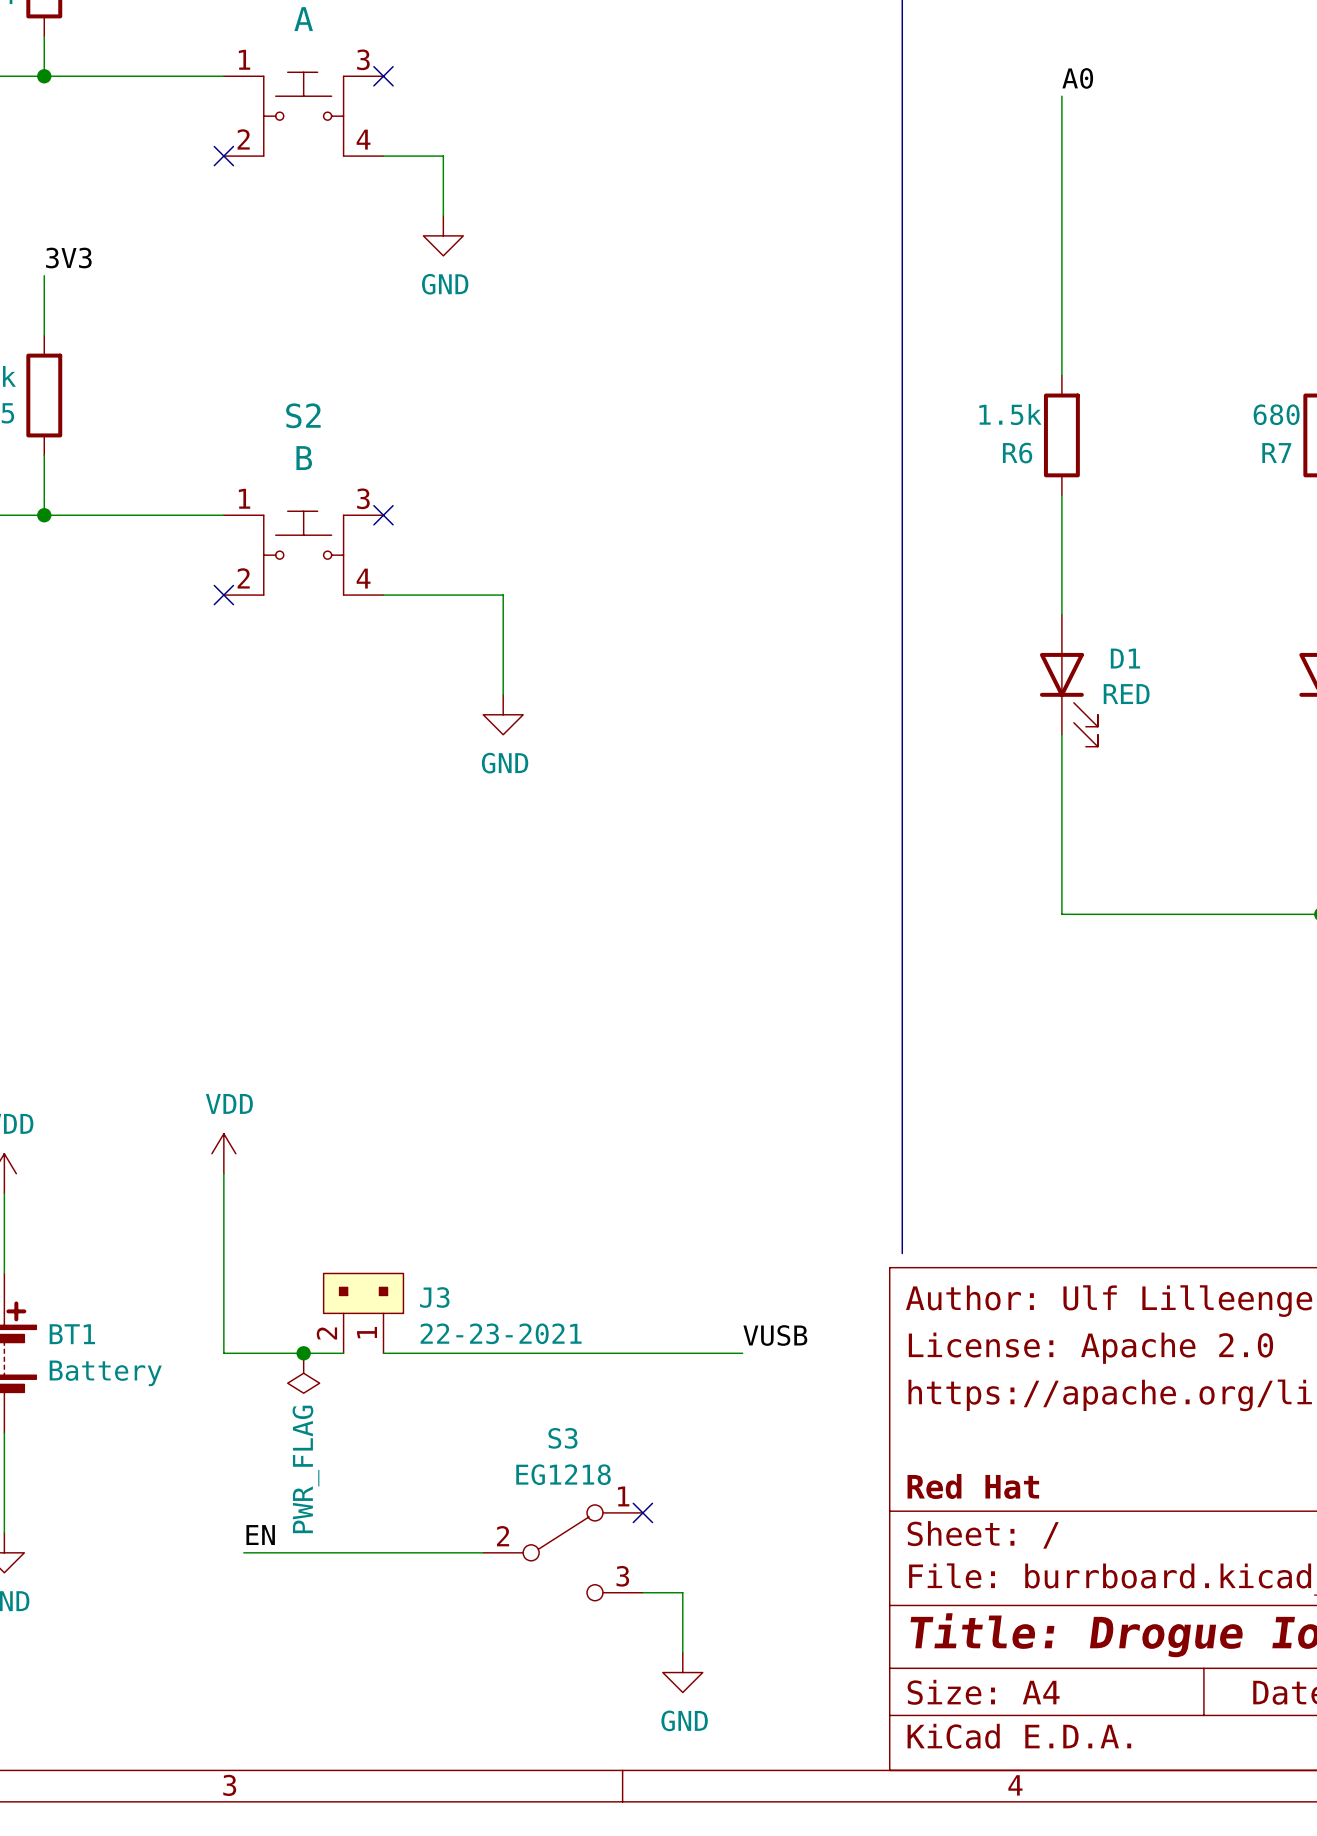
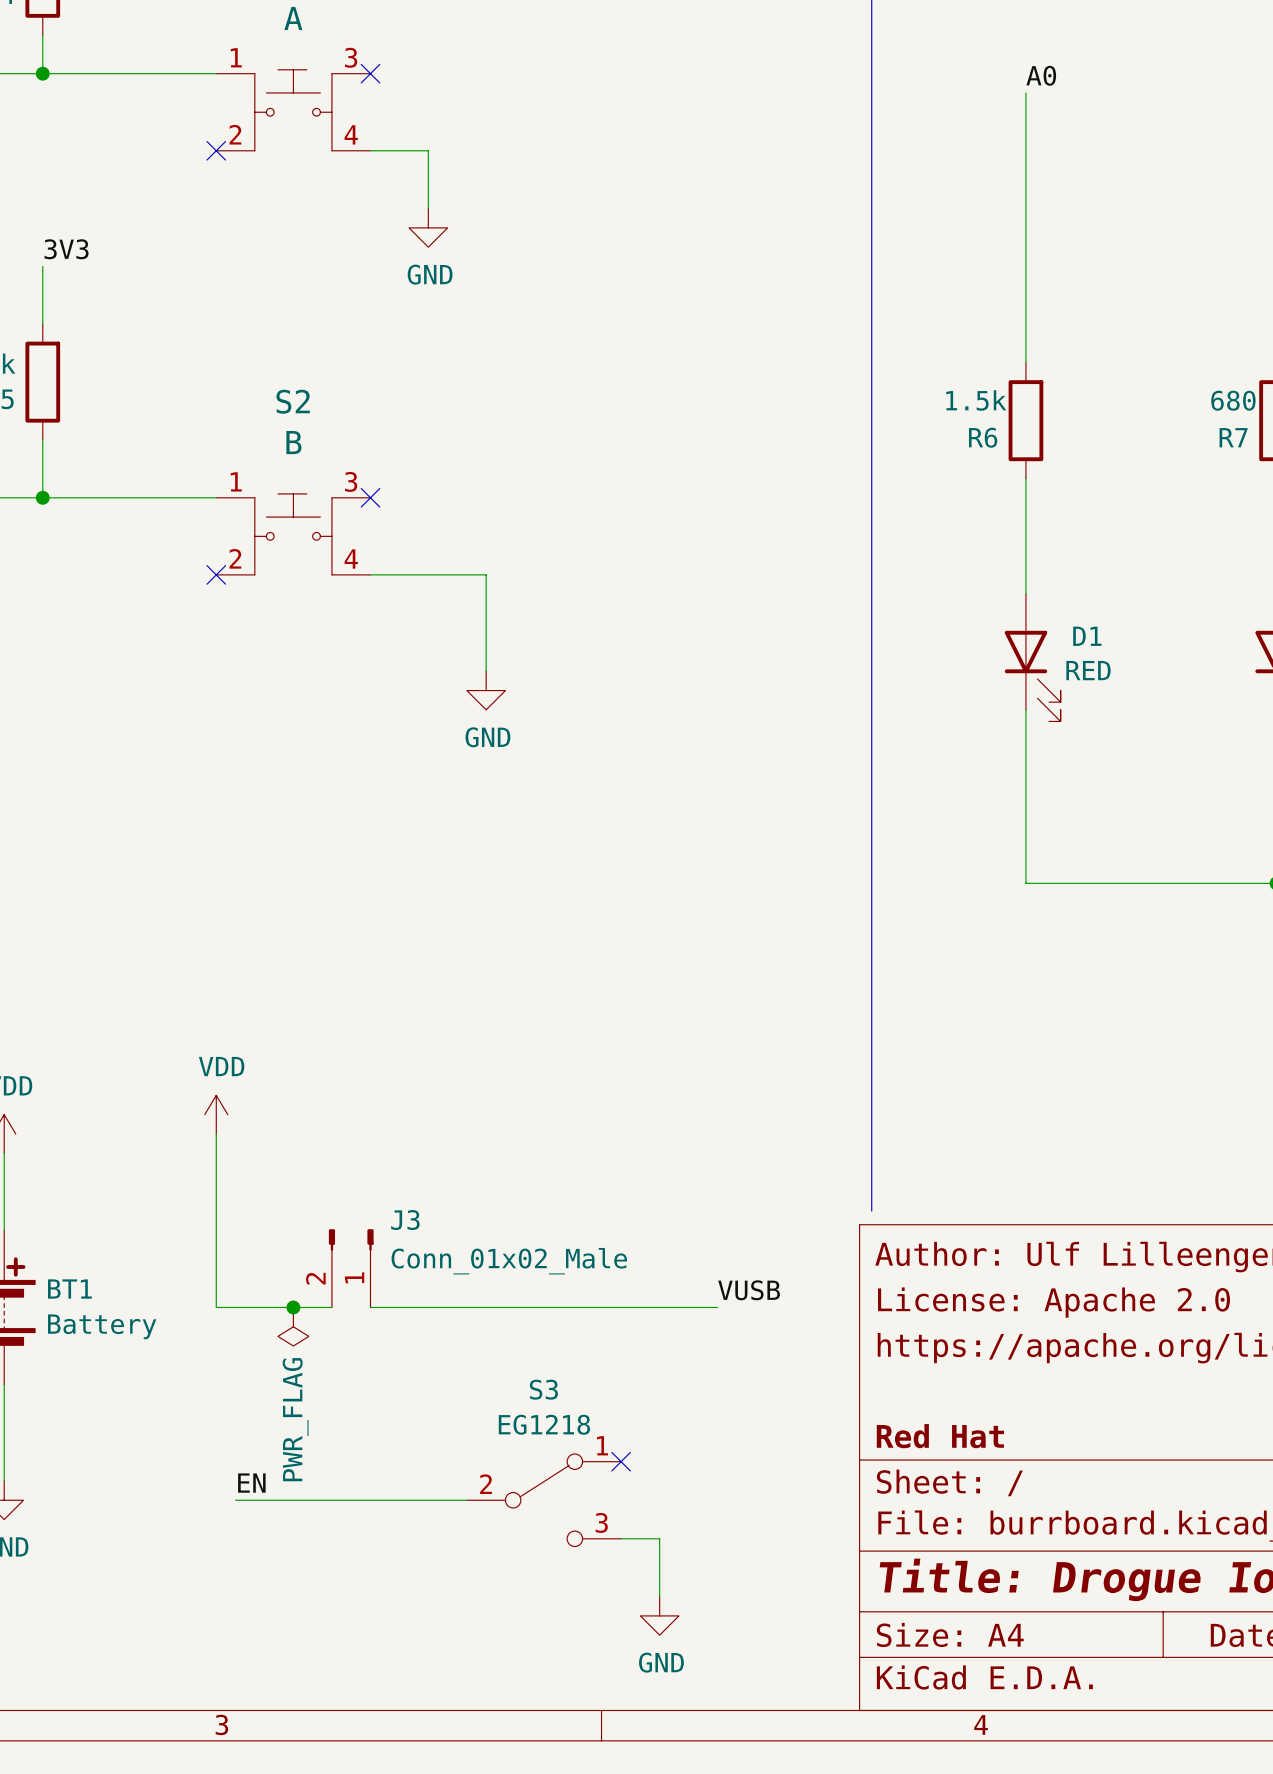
J3 symbol: [323, 1273, 404, 1354] -> [328, 1229, 374, 1308]
J3 name position: J3 (434, 1297) -> J3 (405, 1220)
J3 value: 22-23-2021 (501, 1333) -> Conn_01x02_Male (509, 1261)

